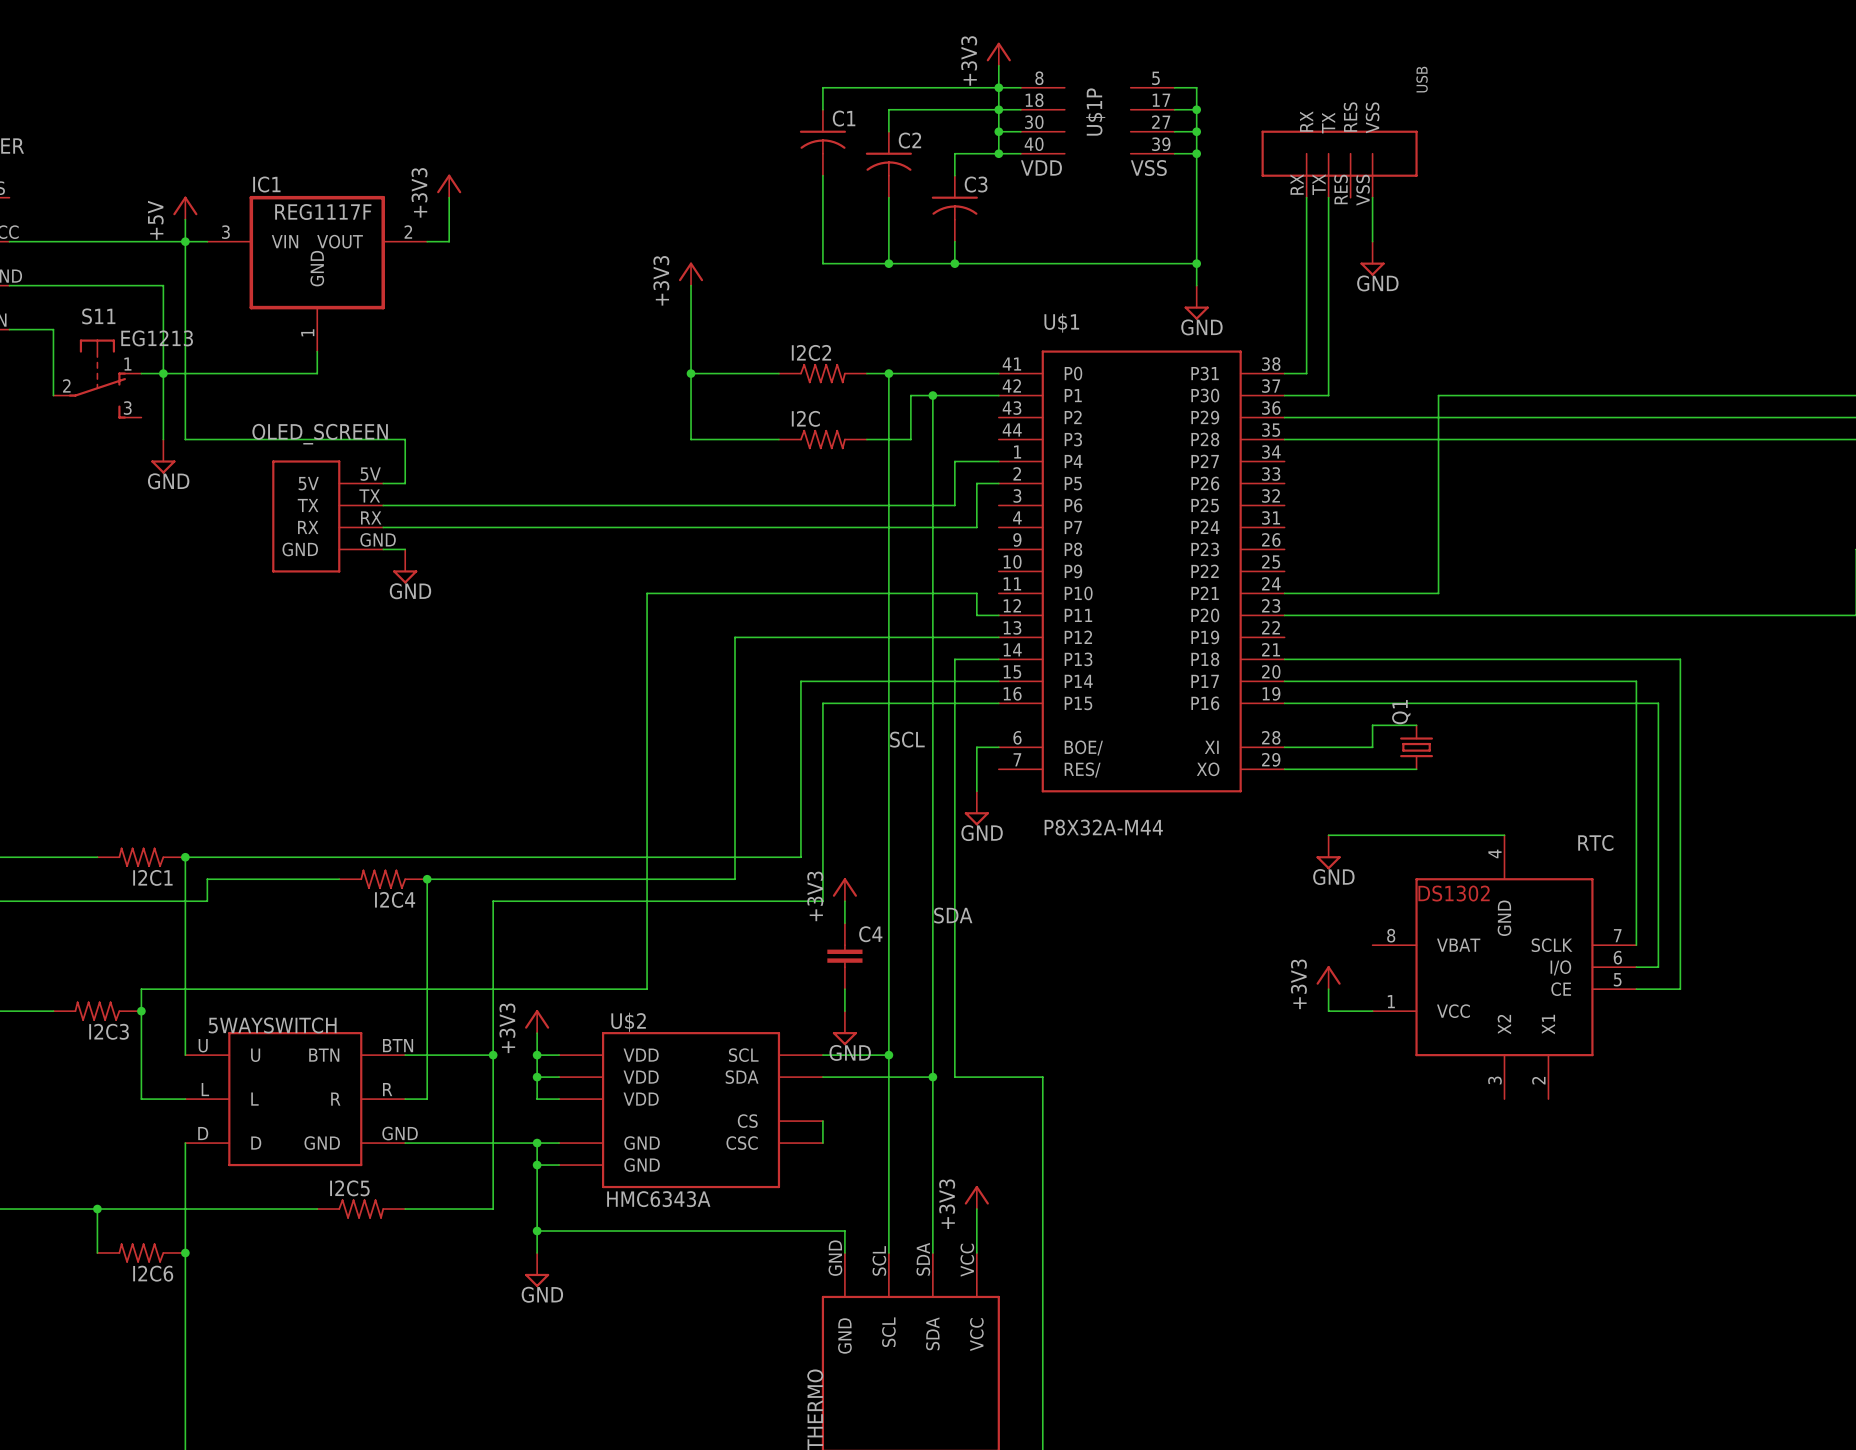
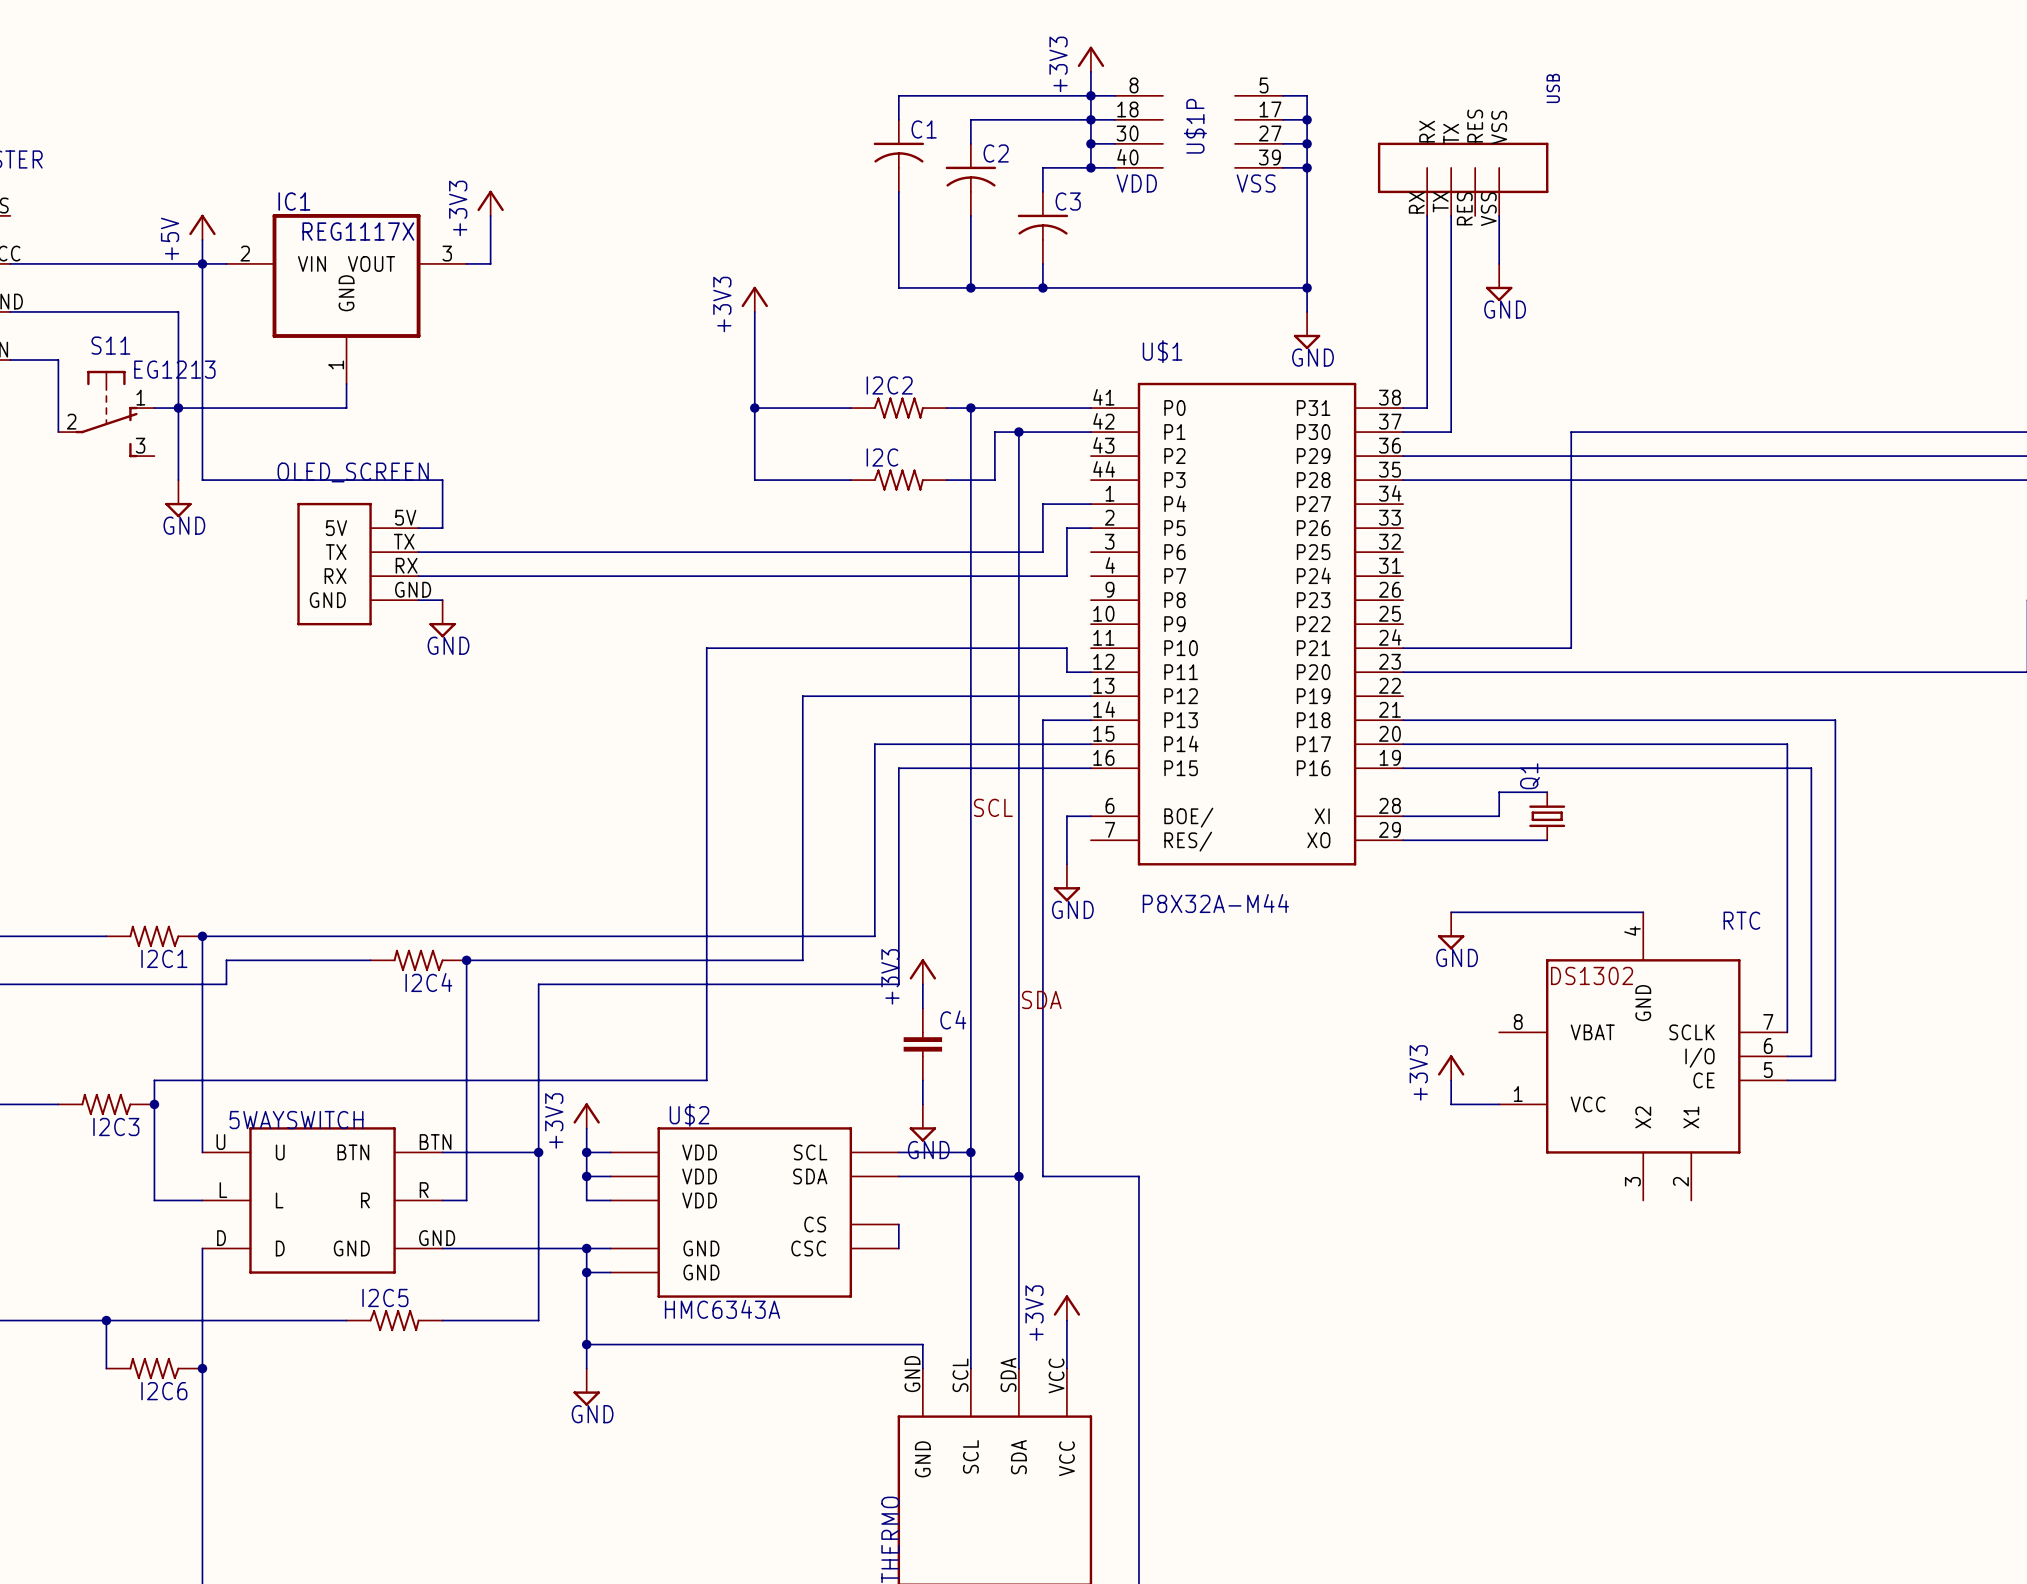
IC1 value: REG1117F (323, 211) -> REG1117X (358, 231)
IC1 pin number: 3 (225, 232) -> 2 (245, 253)
IC1 pin number: 2 (408, 232) -> 3 (447, 253)

